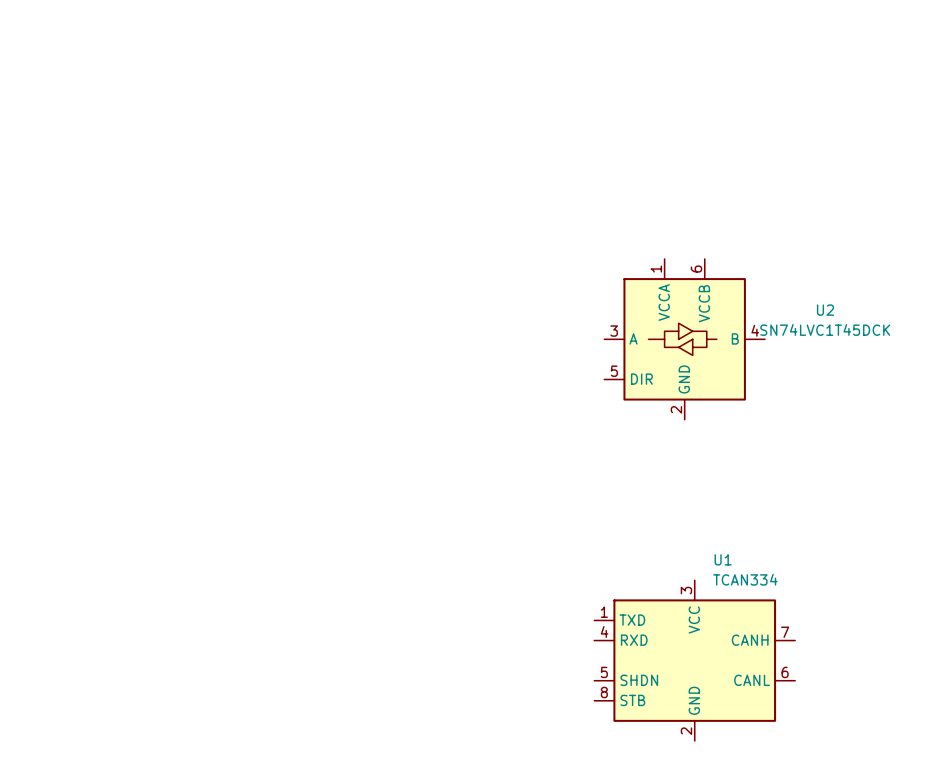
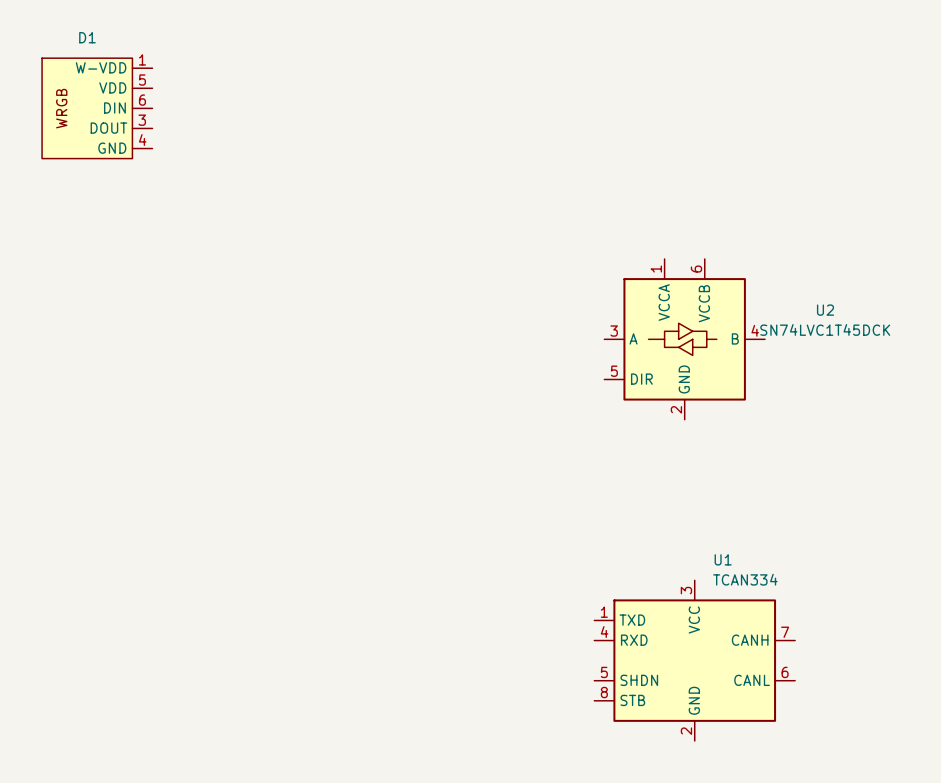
D1: none -> (97, 108)

